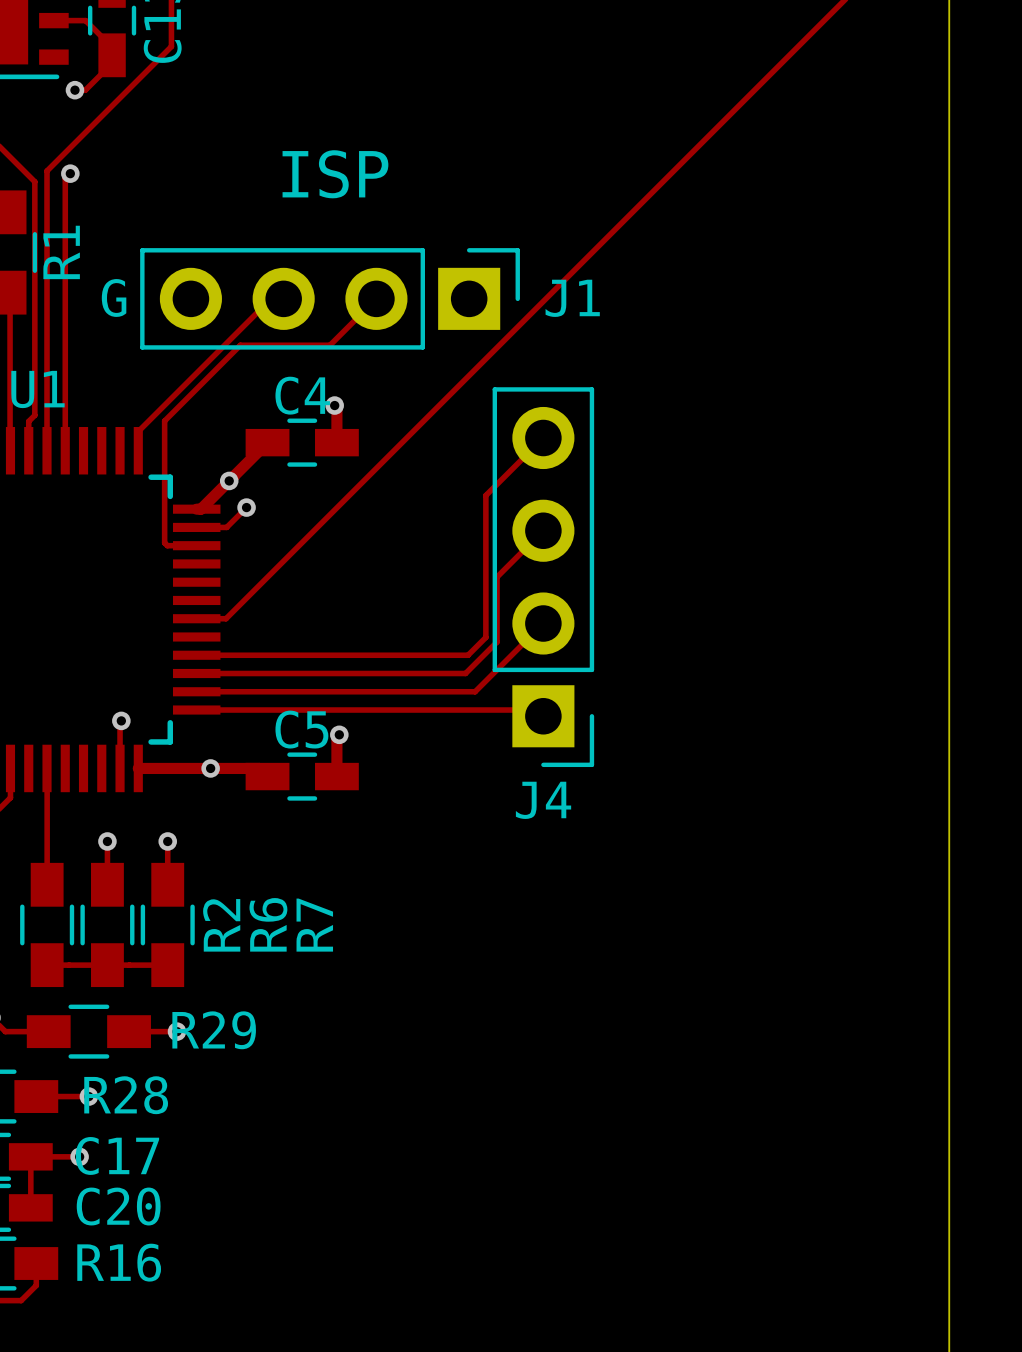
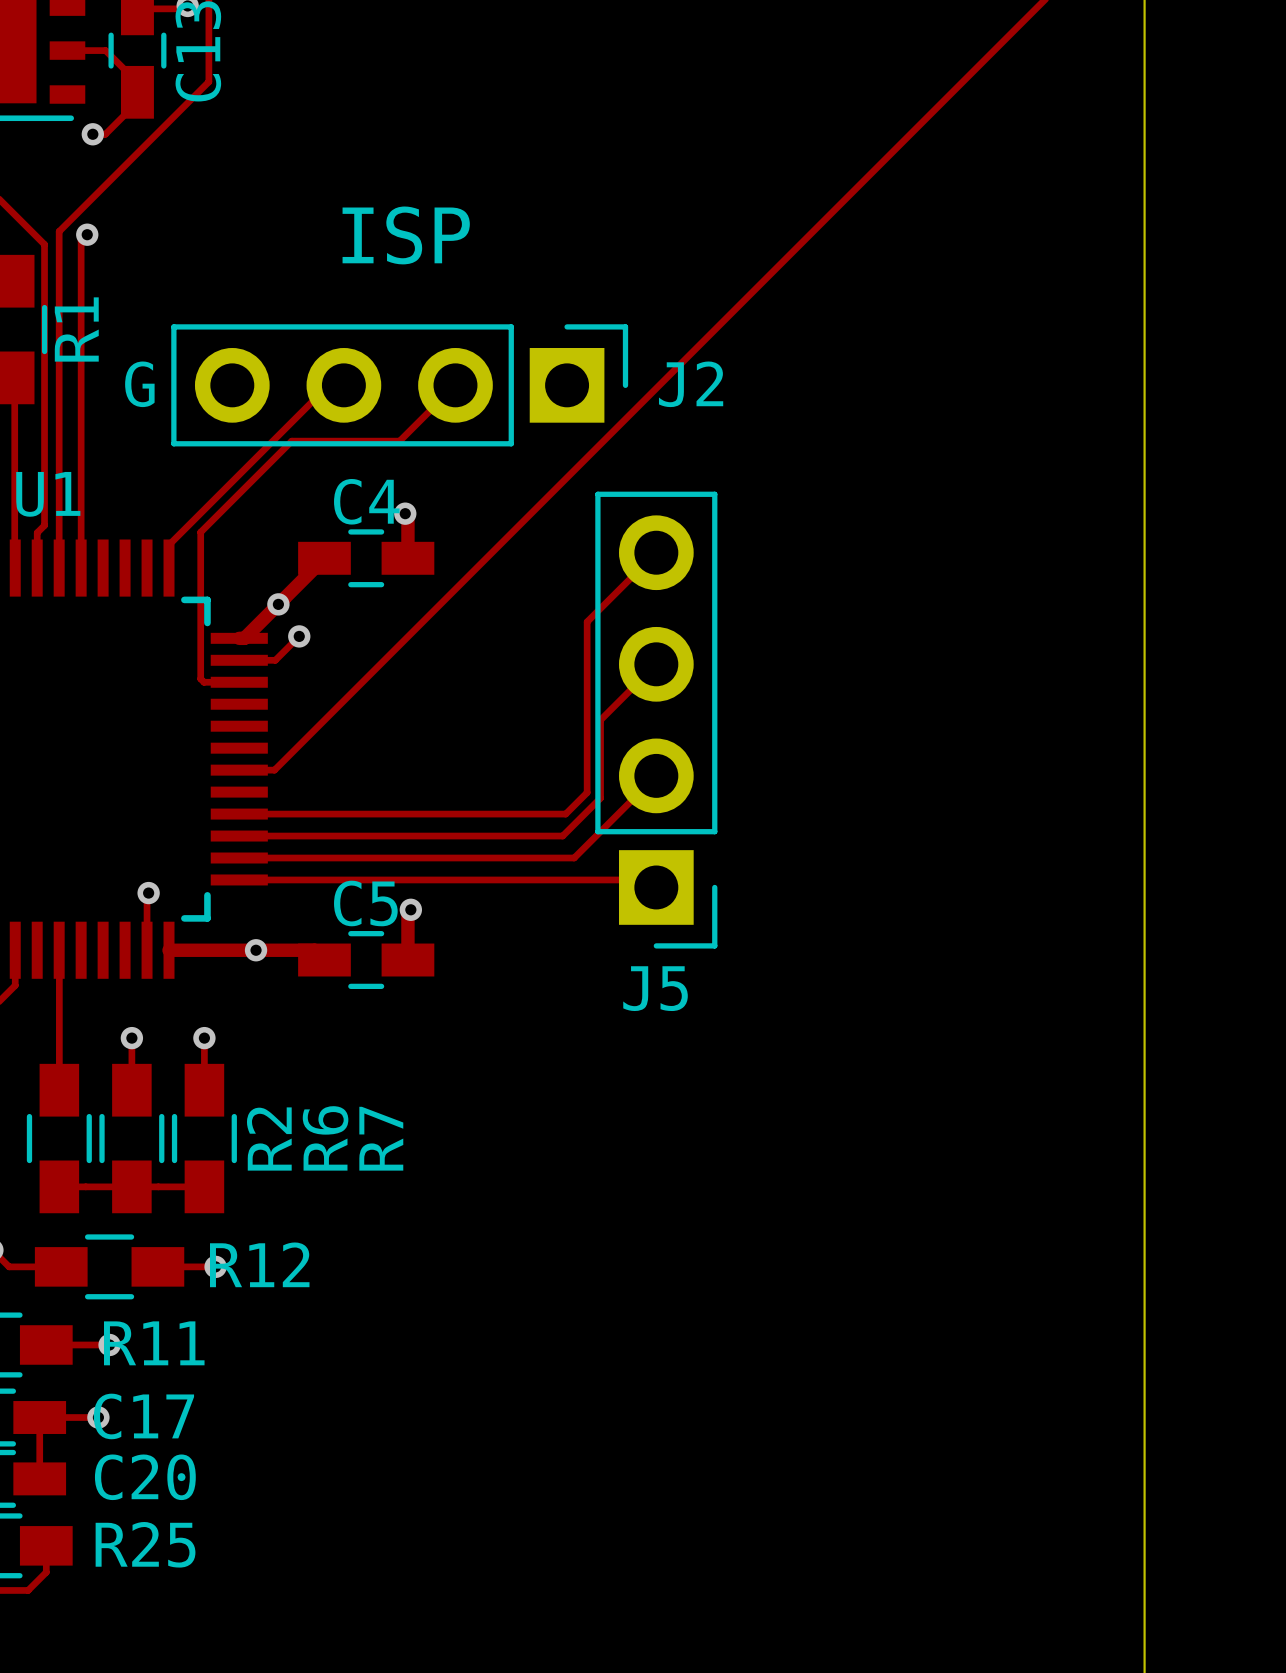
J1 name: J1 (572, 298) -> J2 (691, 384)
J4 name: J4 (543, 800) -> J5 (655, 988)
R29 name: R29 (214, 1030) -> R12 (259, 1264)
R28 name: R28 (126, 1095) -> R11 (154, 1343)
R16 name: R16 (119, 1262) -> R25 (145, 1544)

